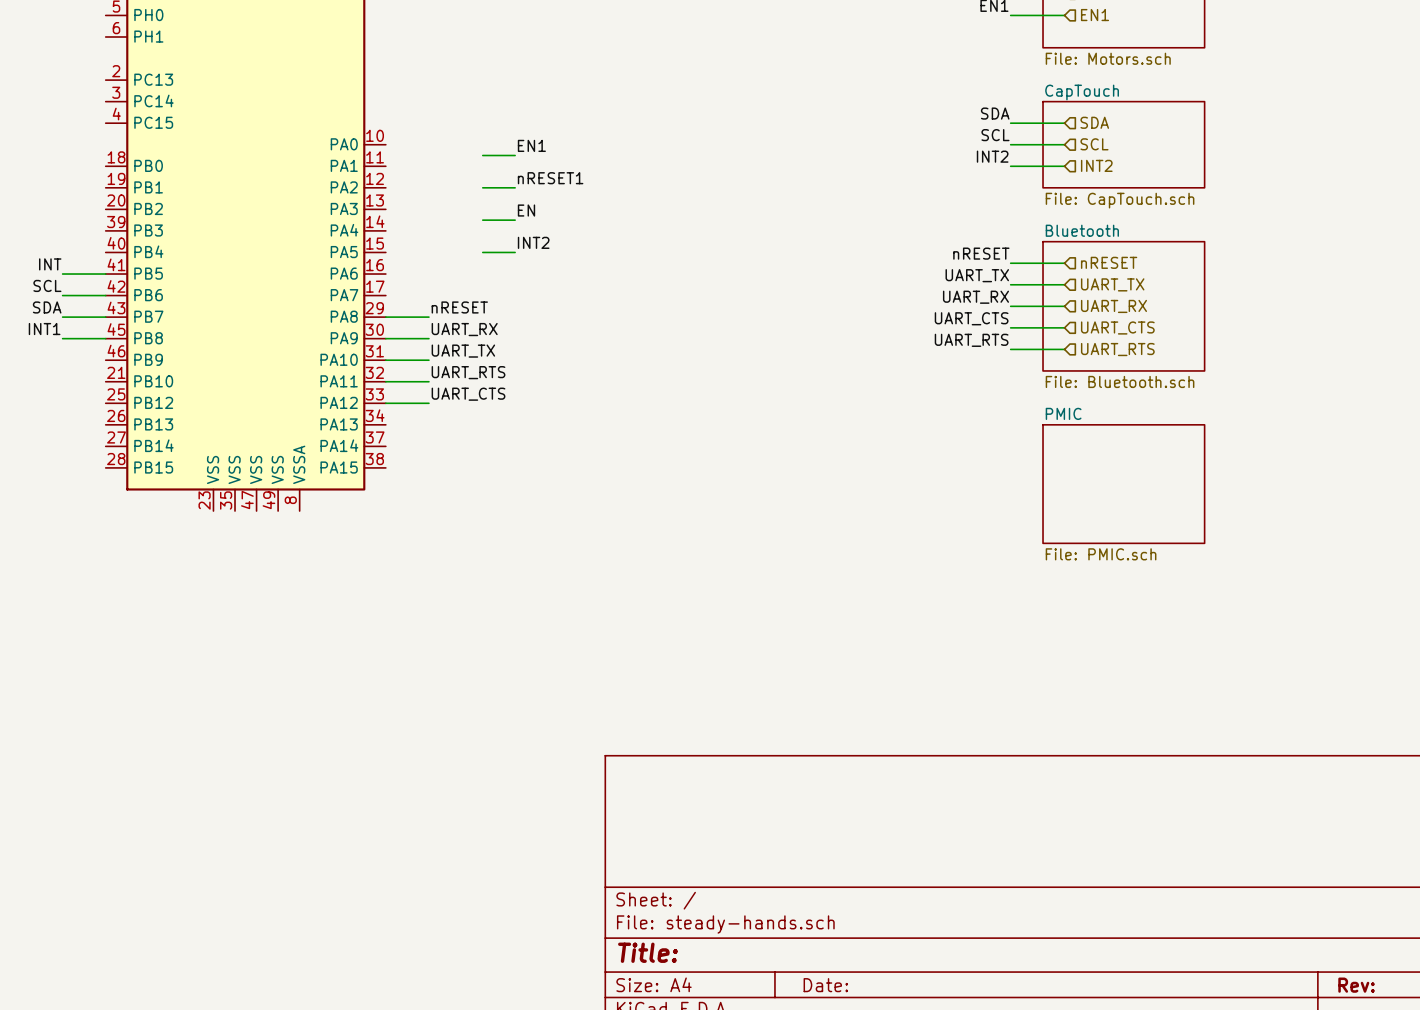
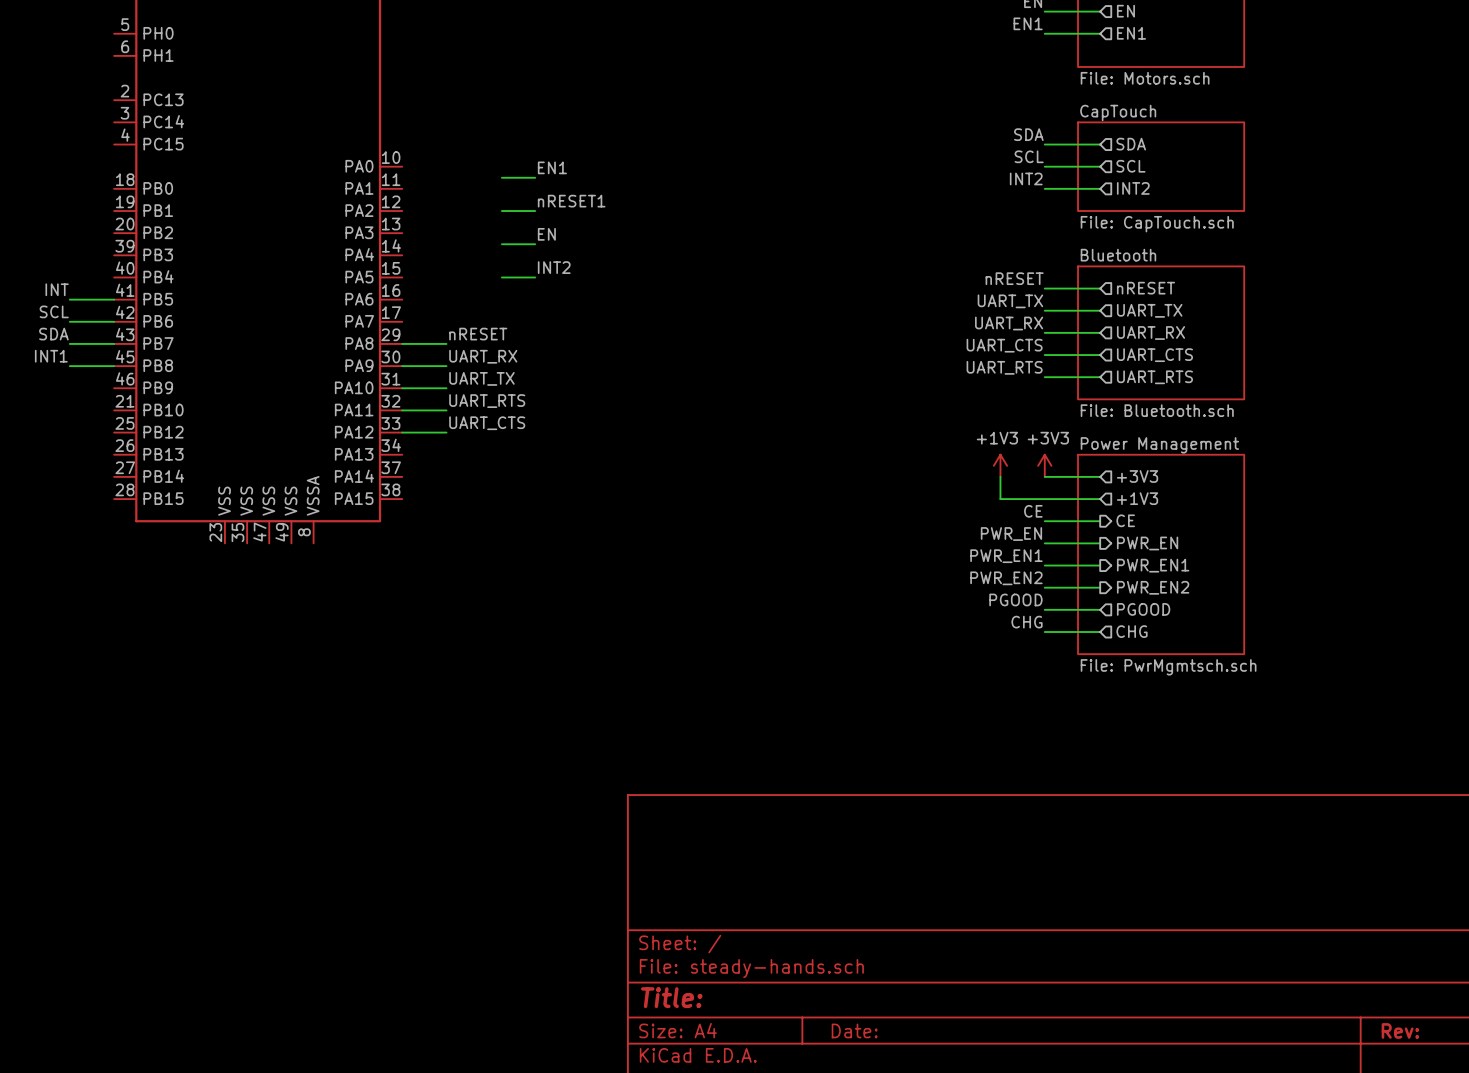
power symbol: none -> +1V3 (1000, 465)
power symbol: none -> +3V3 (1044, 465)
hierarchical label: none -> +3V3 (1137, 476)
wire: none -> (1000, 476) (1000, 499) (1100, 499)
wire: none -> (1044, 476) (1100, 476)
hierarchical label: none -> +1V3 (1137, 498)
label: none -> CE (1033, 511)
sheet PMIC: File: PMIC.sch (1123, 484) -> none
wire: none -> (1044, 521) (1100, 521)
hierarchical label: none -> CE (1125, 520)
label: none -> PWR_EN (1011, 534)
wire: none -> (1044, 543) (1100, 543)
hierarchical label: none -> PWR_EN (1147, 543)
sheet Power Management: none -> File: PwrMgmtsch.sch (1161, 554)
label: none -> PWR_EN1 (1006, 556)
wire: none -> (1044, 565) (1100, 565)
hierarchical label: none -> PWR_EN1 (1153, 565)
label: none -> PWR_EN2 (1006, 578)
wire: none -> (1044, 587) (1100, 587)
hierarchical label: none -> PWR_EN2 (1153, 587)
label: none -> PGOOD (1015, 599)
wire: none -> (1044, 609) (1100, 609)
hierarchical label: none -> PGOOD (1143, 609)
label: none -> CHG (1027, 622)
hierarchical label: none -> CHG (1132, 631)
wire: none -> (1044, 632) (1100, 632)

